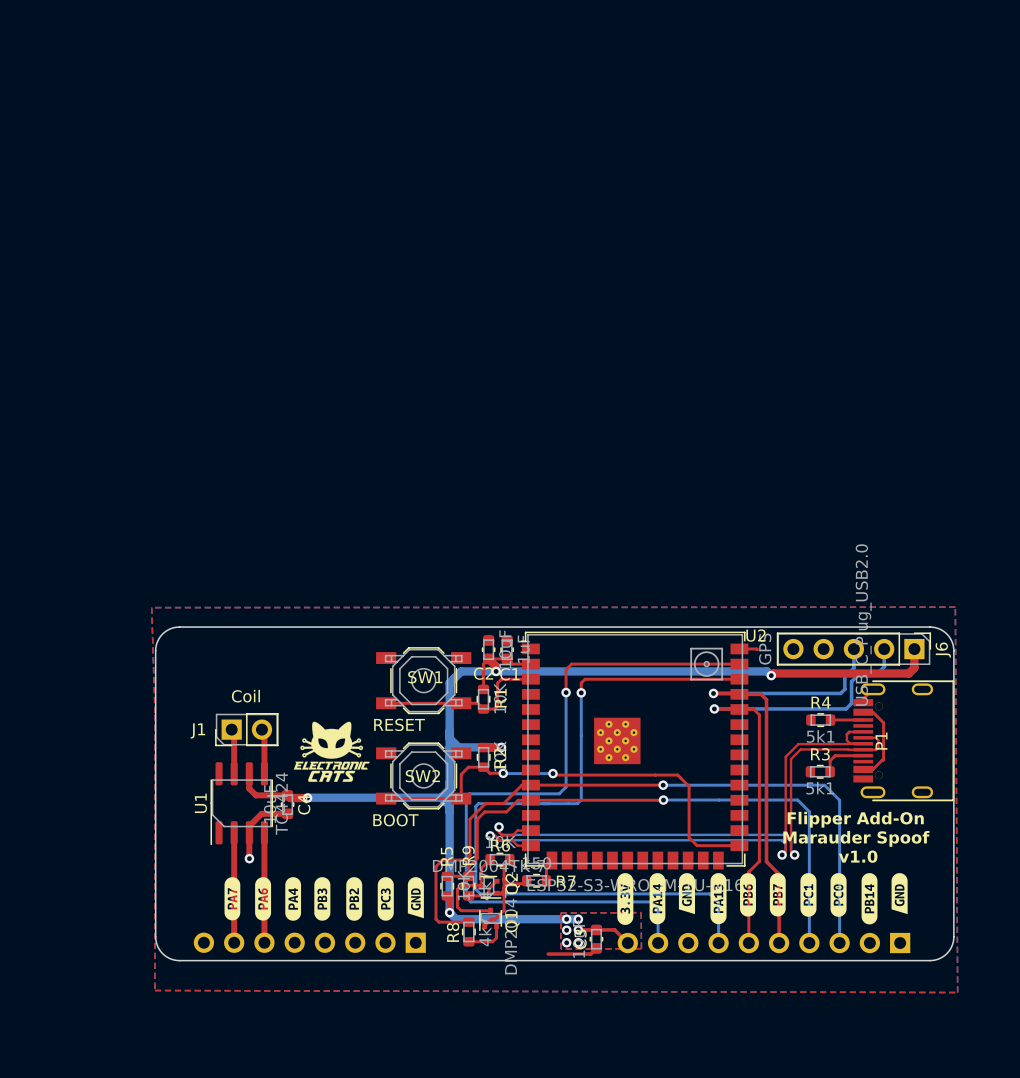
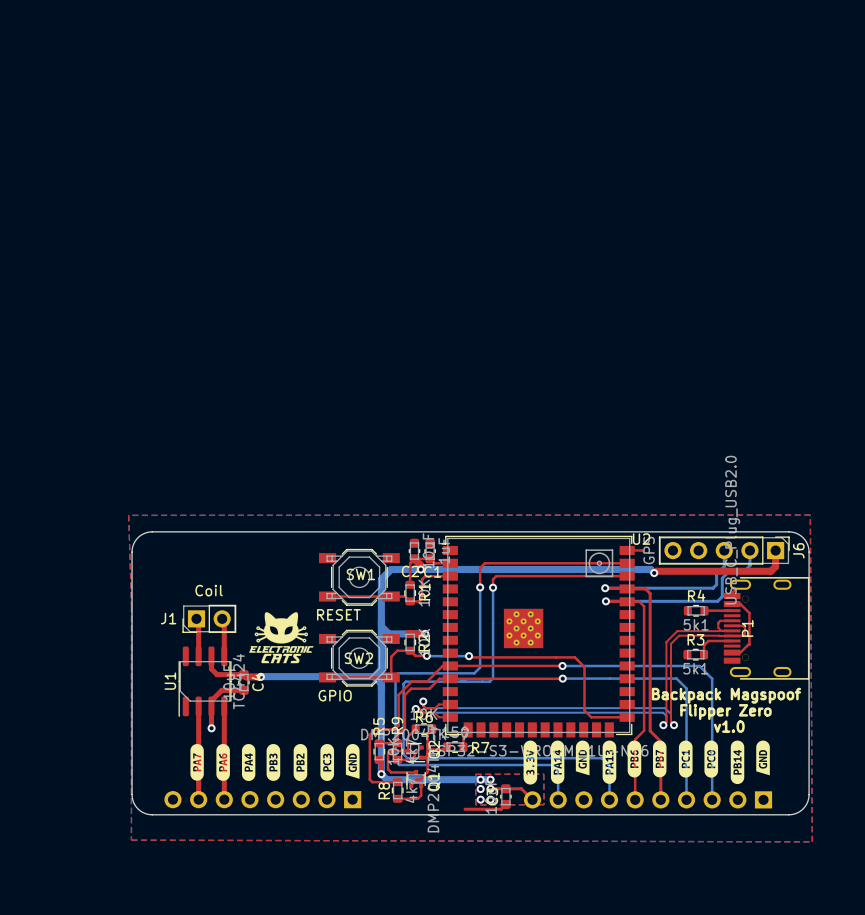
text: Flipper Add-On (855, 819) -> Backpack Magspoof (726, 695)
SW2 value: BOOT (395, 820) -> GPIO (335, 695)
text: Marauder Spoof (856, 838) -> Flipper Zero (725, 712)

